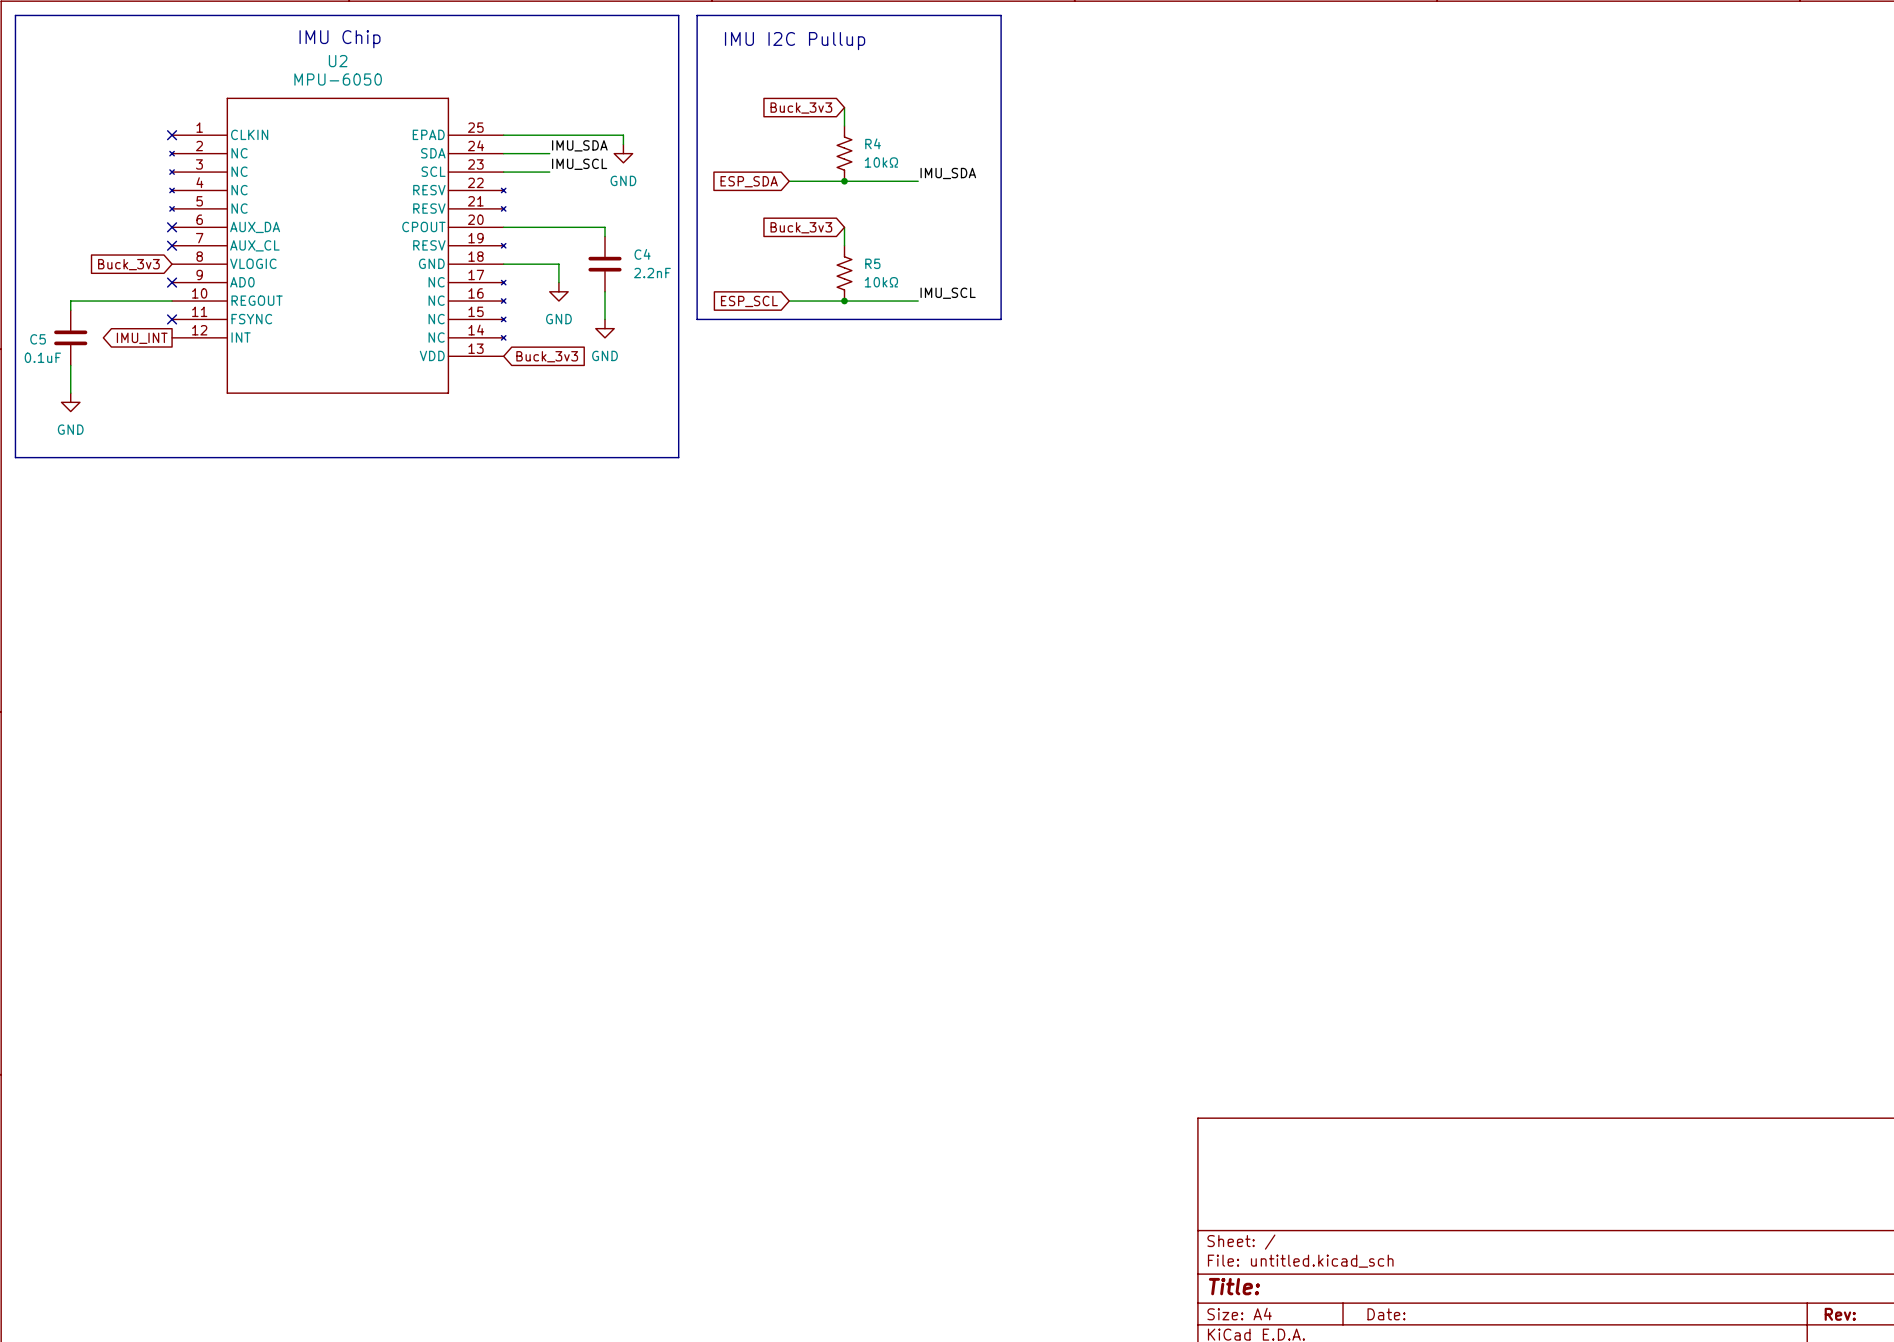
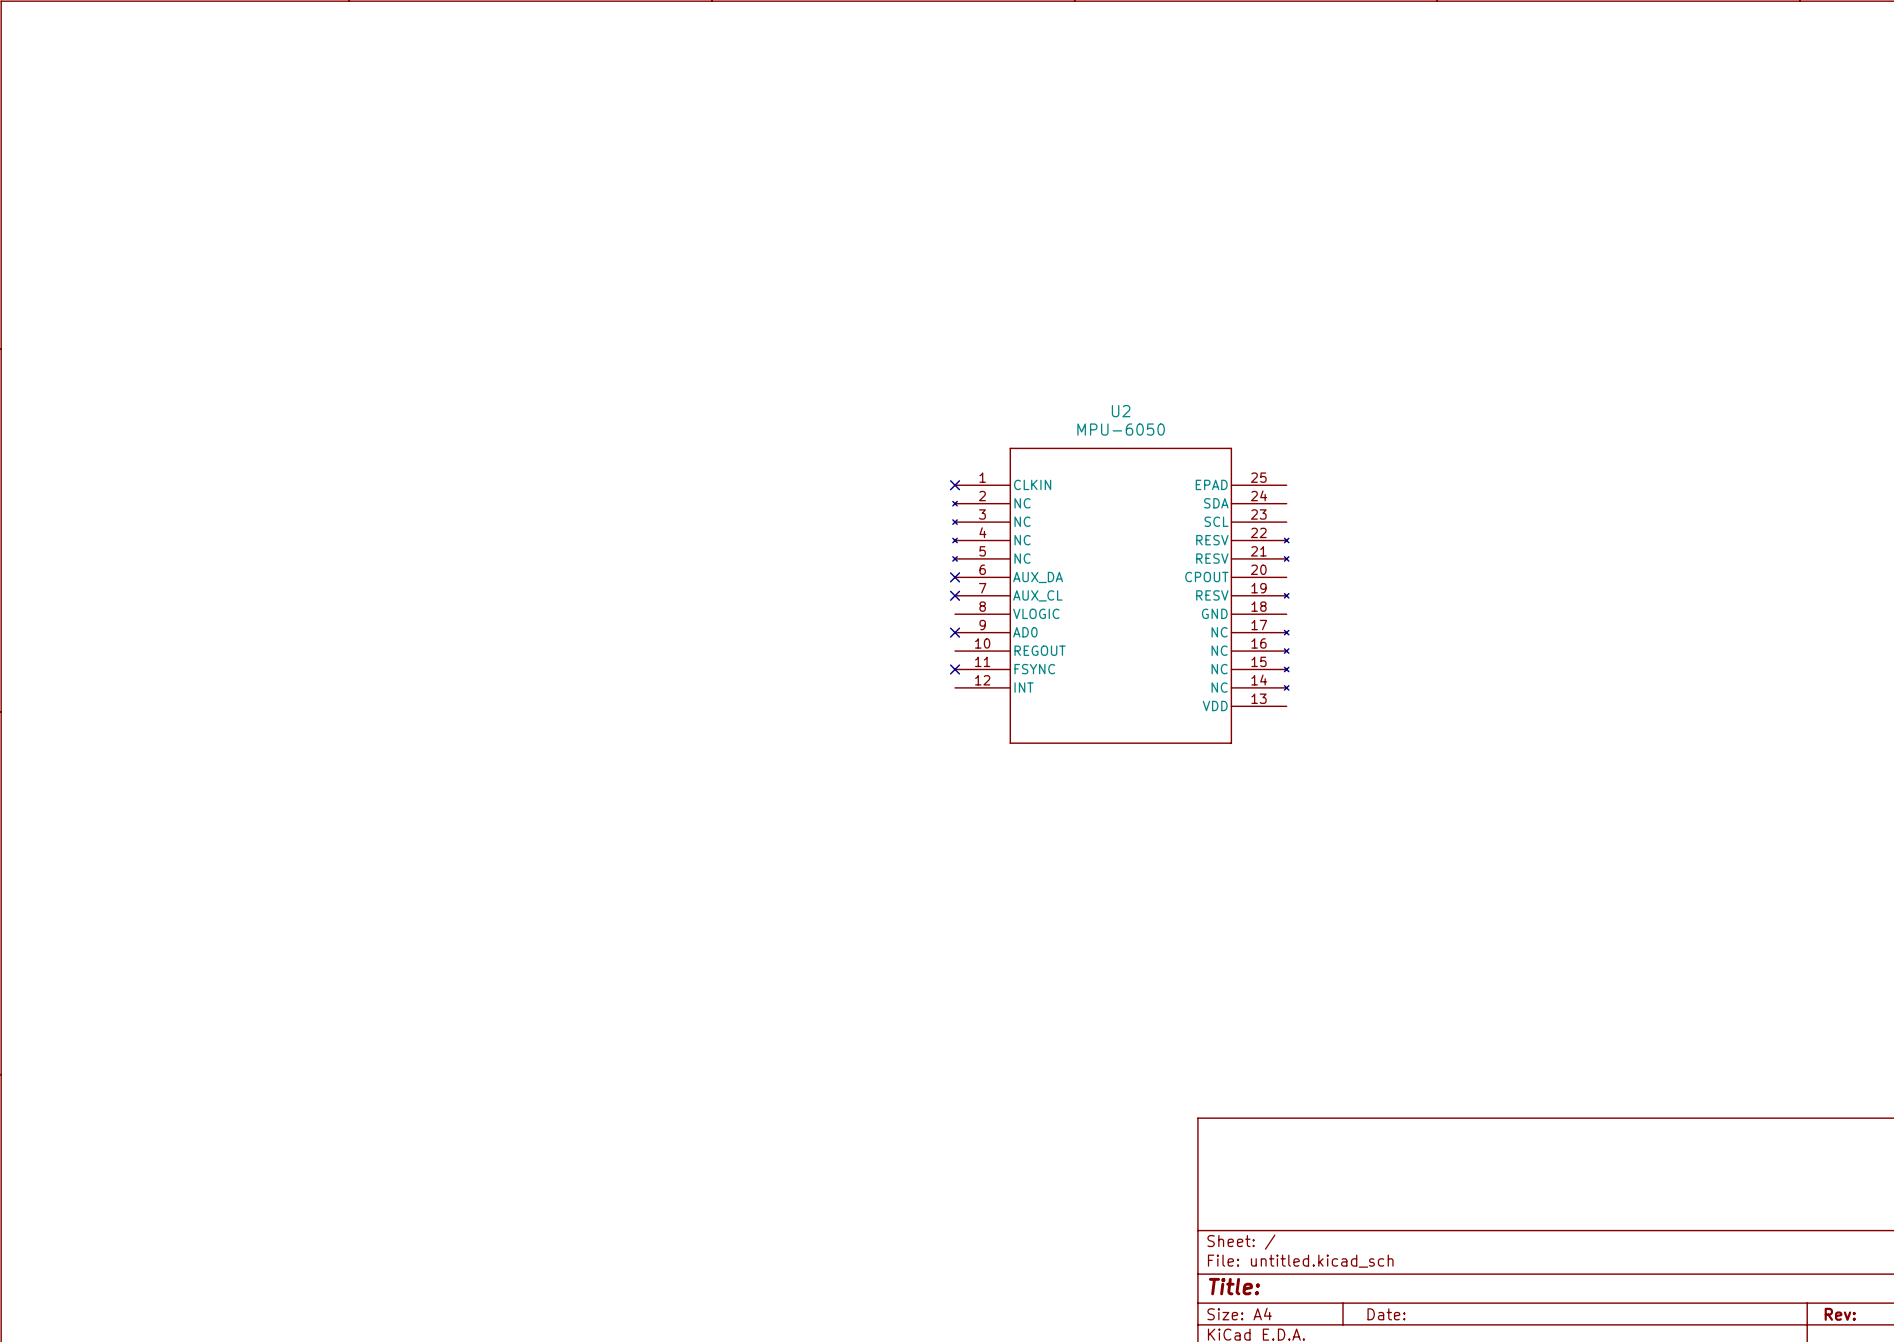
line: (15, 15) (678, 15) (678, 457) (15, 457) (15, 15) -> none
line: (697, 15) (1001, 15) (1001, 319) (697, 319) (697, 15) -> none
text: IMU Chip (340, 39) -> none
text: IMU I2C Pullup (795, 41) -> none
wire: (844, 107) (844, 125) -> none
global label: Buck_3v3 (801, 108) -> none
no-connect mark: (172, 135) -> none
wire: (503, 135) (623, 135) (623, 144) -> none
label: IMU_SDA (579, 145) -> none
wire: (503, 153) (549, 153) -> none
power symbol: GND (623, 153) -> none
R4: 10kΩ (844, 153) -> none
label: IMU_SCL (579, 164) -> none
wire: (503, 172) (549, 172) -> none
label: IMU_SDA (948, 173) -> none
global label: ESP_SDA (749, 181) -> none
wire: (789, 181) (918, 181) -> none
junction: (844, 181) -> none
no-connect mark: (172, 227) -> none
wire: (503, 227) (605, 227) (605, 236) -> none
global label: Buck_3v3 (801, 227) -> none
wire: (844, 227) (844, 245) -> none
no-connect mark: (172, 245) -> none
U2 position: (337, 245) -> (1120, 595)
global label: Buck_3v3 (128, 264) -> none
wire: (503, 264) (558, 264) (558, 282) -> none
C4: 2.2nF (605, 264) -> none
R5: 10kΩ (844, 273) -> none
no-connect mark: (172, 282) -> none
power symbol: GND (558, 291) -> none
wire: (605, 291) (605, 319) -> none
label: IMU_SCL (948, 293) -> none
wire: (172, 301) (70, 301) (70, 310) -> none
global label: ESP_SCL (749, 301) -> none
wire: (789, 301) (918, 301) -> none
junction: (844, 301) -> none
no-connect mark: (172, 319) -> none
power symbol: GND (605, 328) -> none
C5: 0.1uF (70, 337) -> none
global label: IMU_INT (142, 338) -> none
global label: Buck_3v3 (547, 356) -> none
wire: (70, 365) (70, 393) -> none
power symbol: GND (70, 402) -> none
no-connect mark: none -> (955, 485)
no-connect mark: none -> (955, 577)
no-connect mark: none -> (955, 595)
no-connect mark: none -> (955, 632)
no-connect mark: none -> (955, 669)

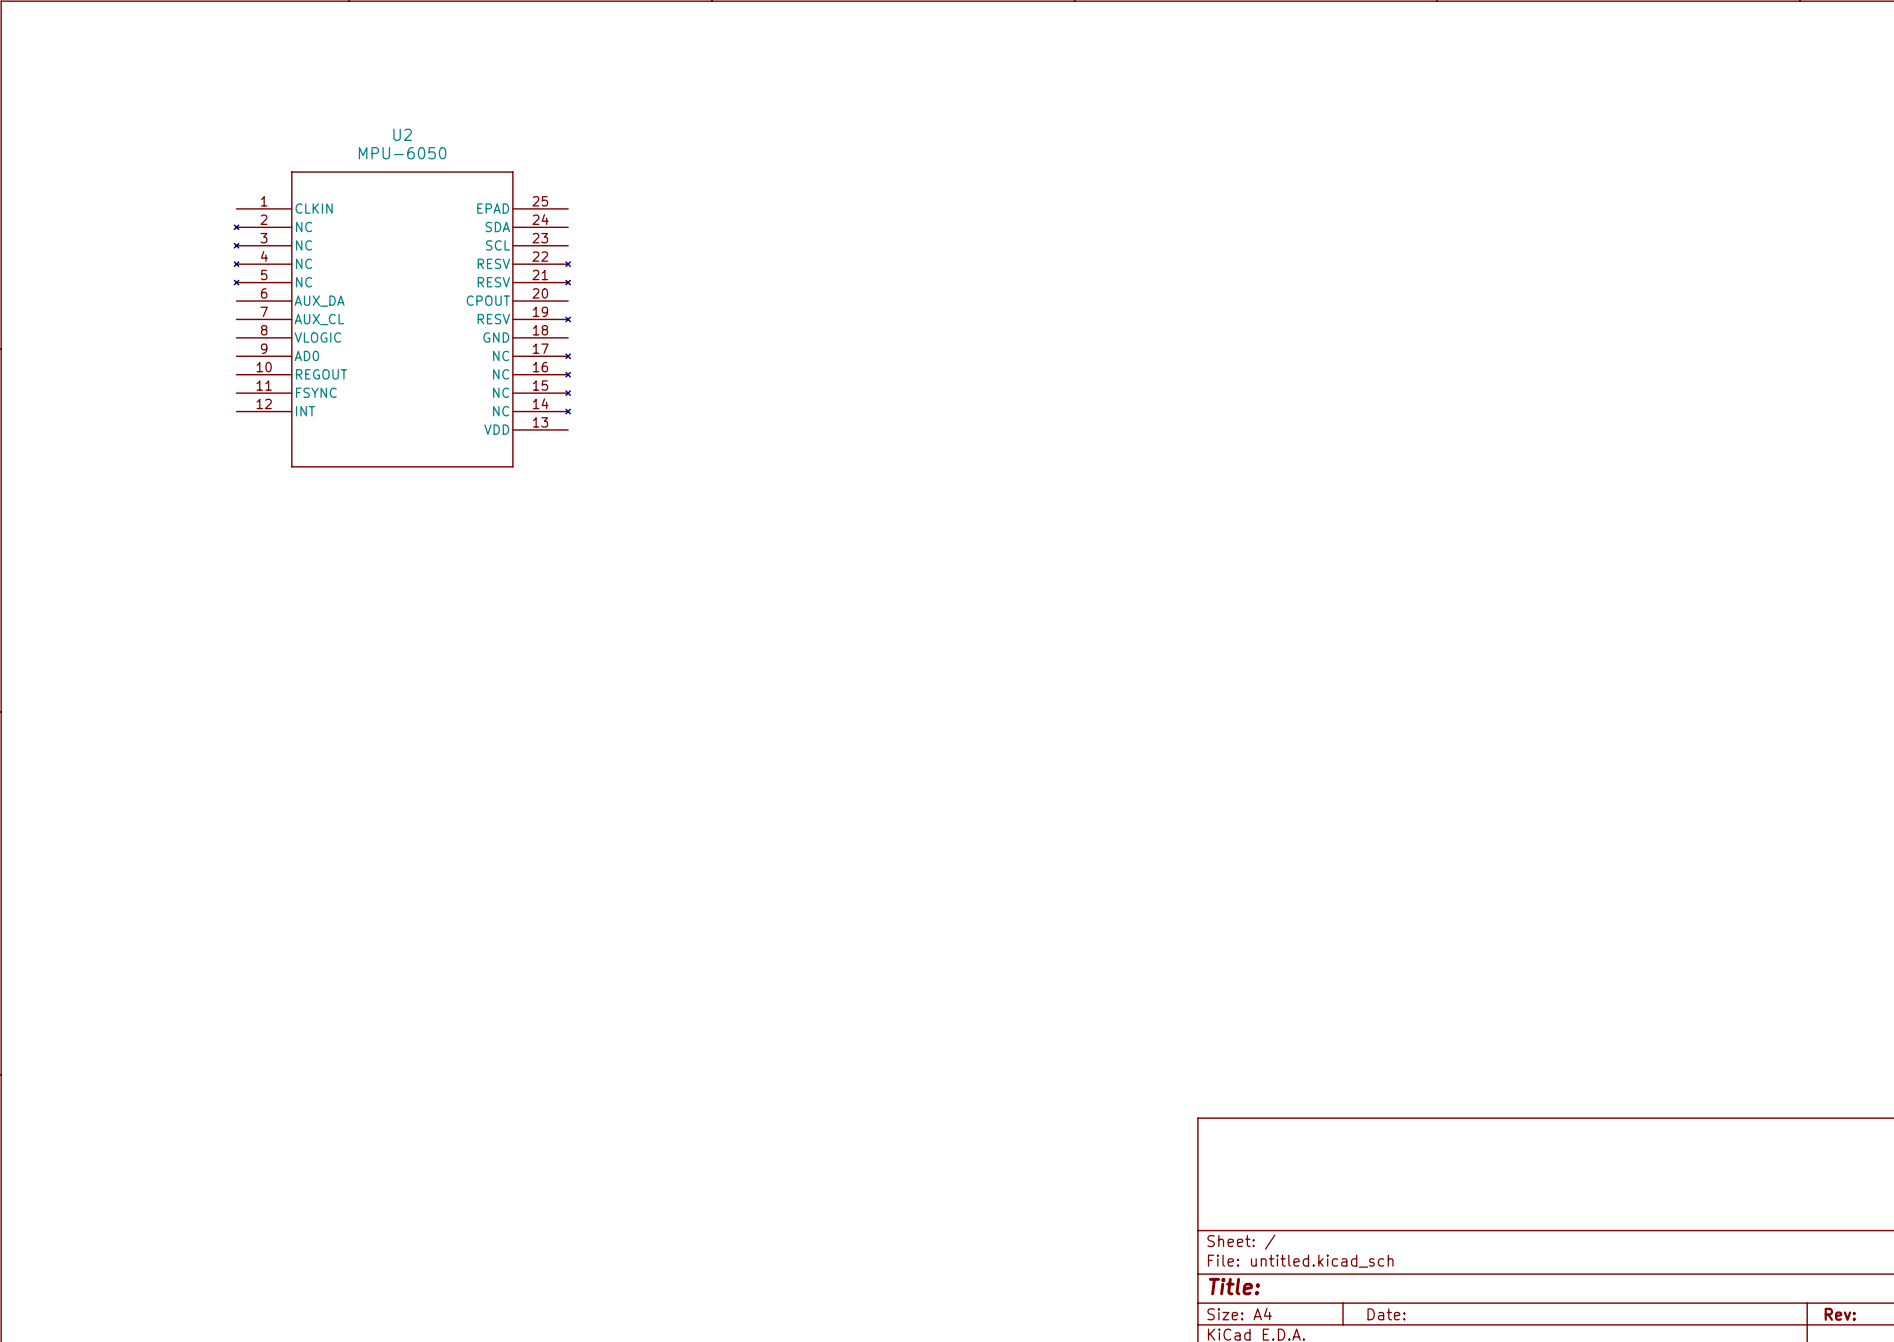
no-connect mark: (955, 485) -> none
no-connect mark: (955, 577) -> none
no-connect mark: (955, 595) -> none
U2 position: (1120, 595) -> (402, 319)
no-connect mark: (955, 632) -> none
no-connect mark: (955, 669) -> none

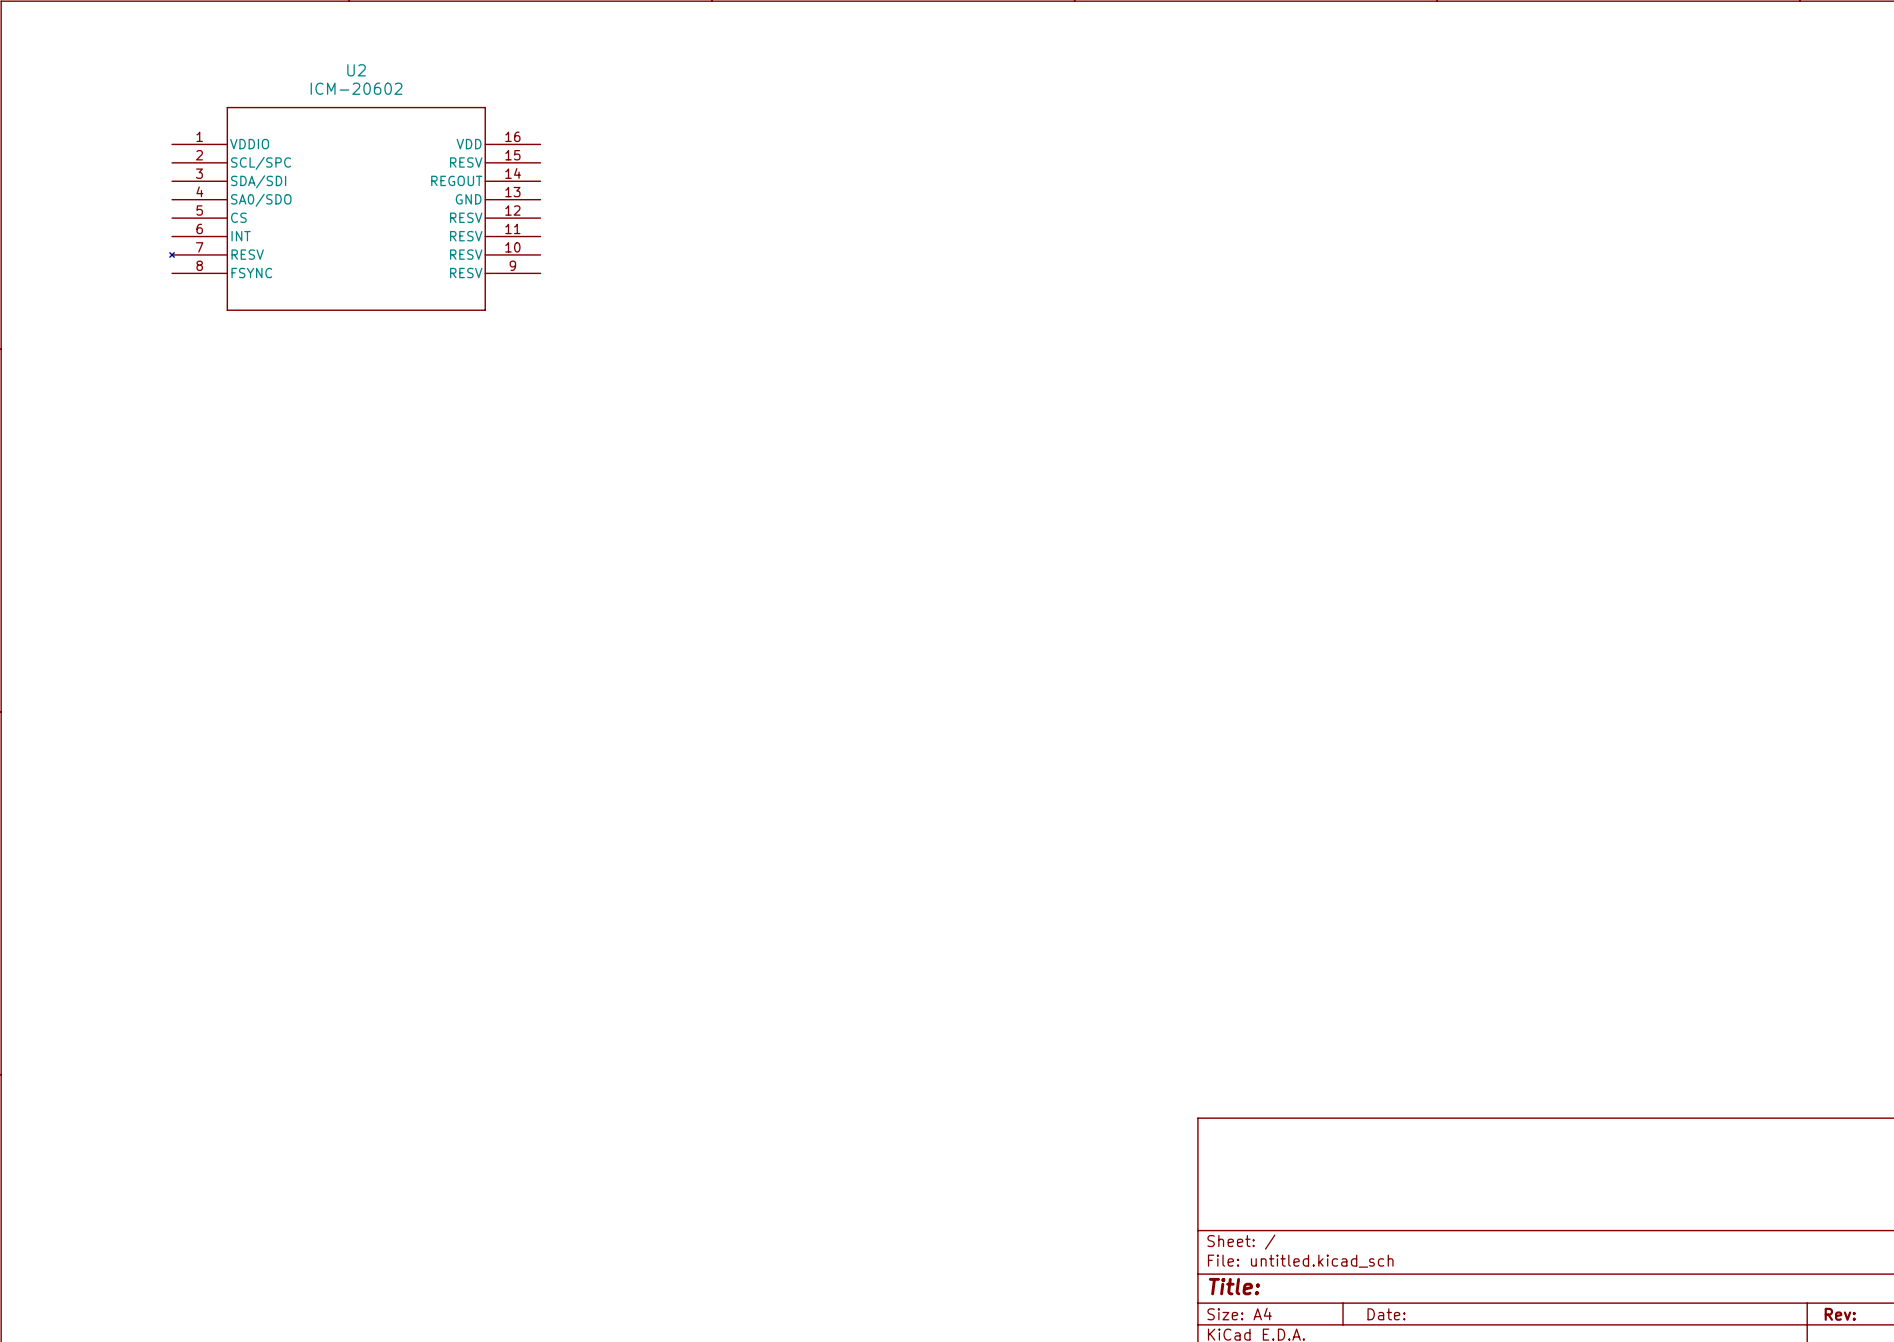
U2 name position: U2 (402, 134) -> U2 (356, 70)
U2 value: MPU-6050 (402, 153) -> ICM-20602 (356, 88)
U2 symbol: [234, 171, 571, 468] -> [169, 107, 541, 311]

